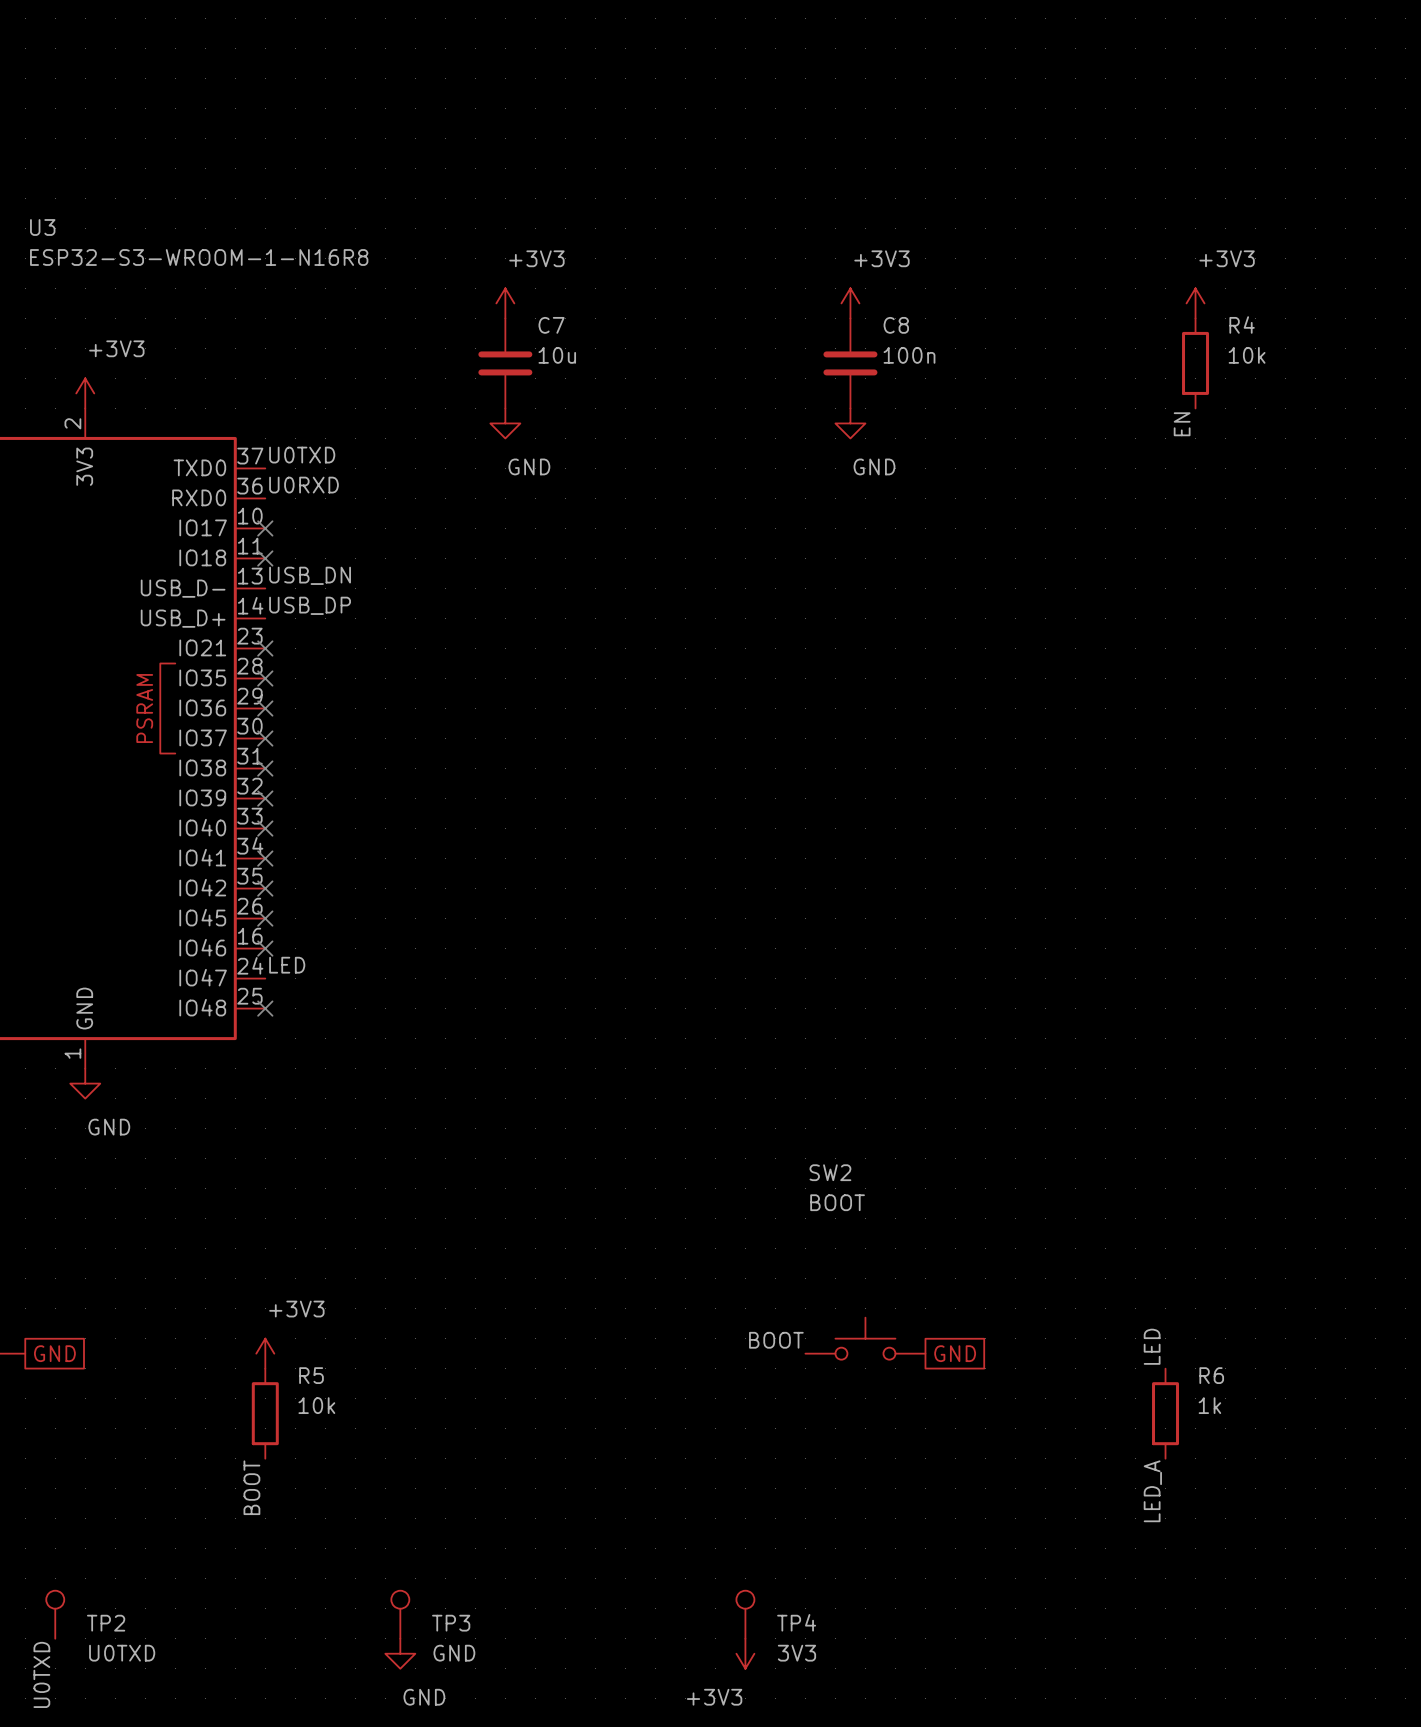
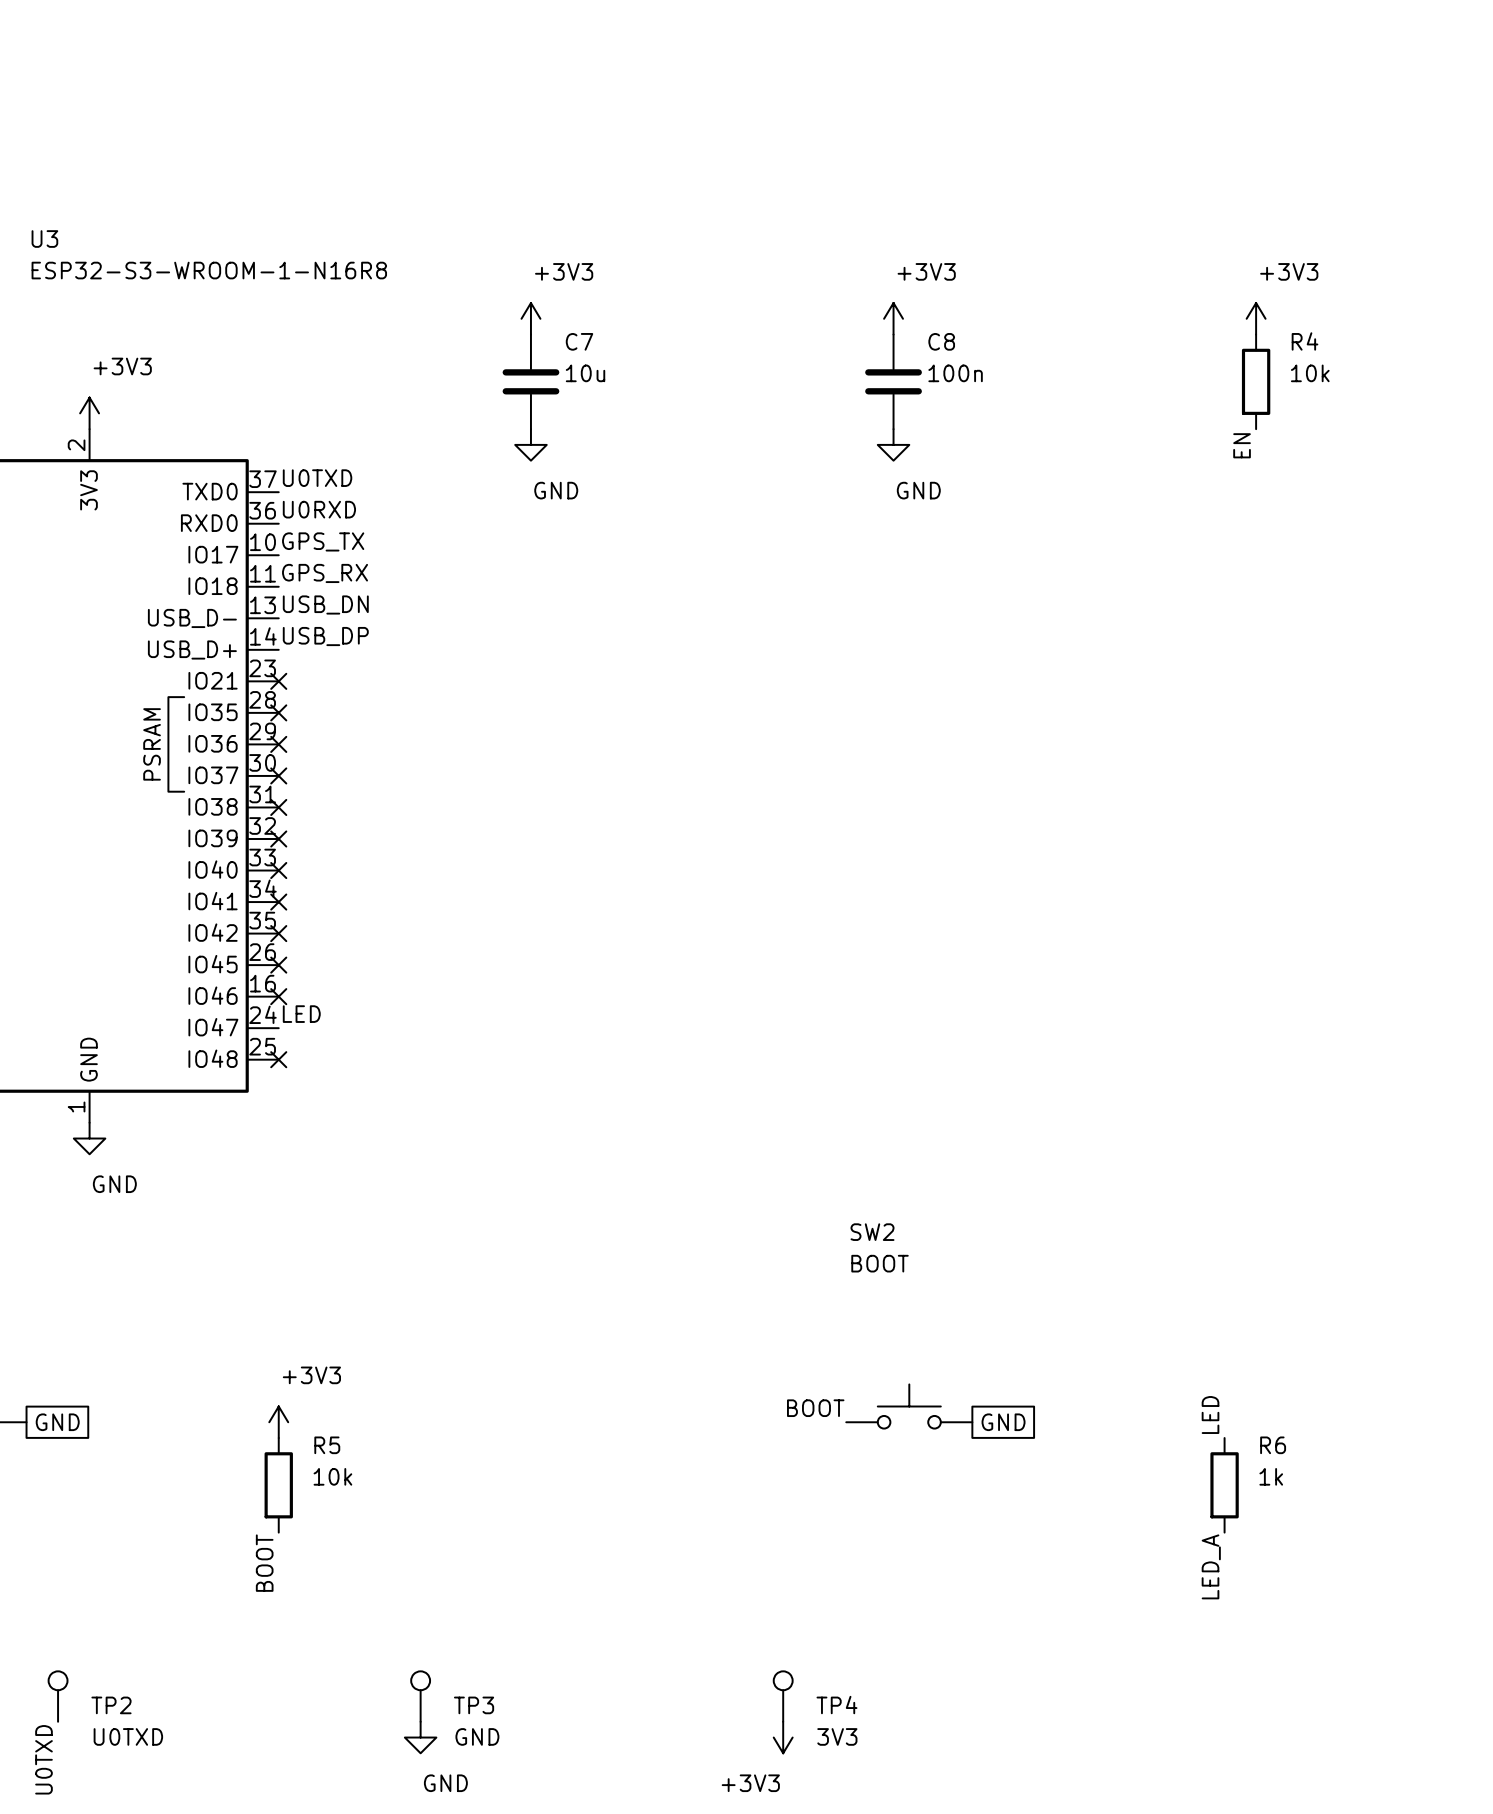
label: none -> GPS_TX (323, 541)
no-connect mark: (265, 528) -> none
label: none -> GPS_RX (325, 573)
no-connect mark: (265, 558) -> none

